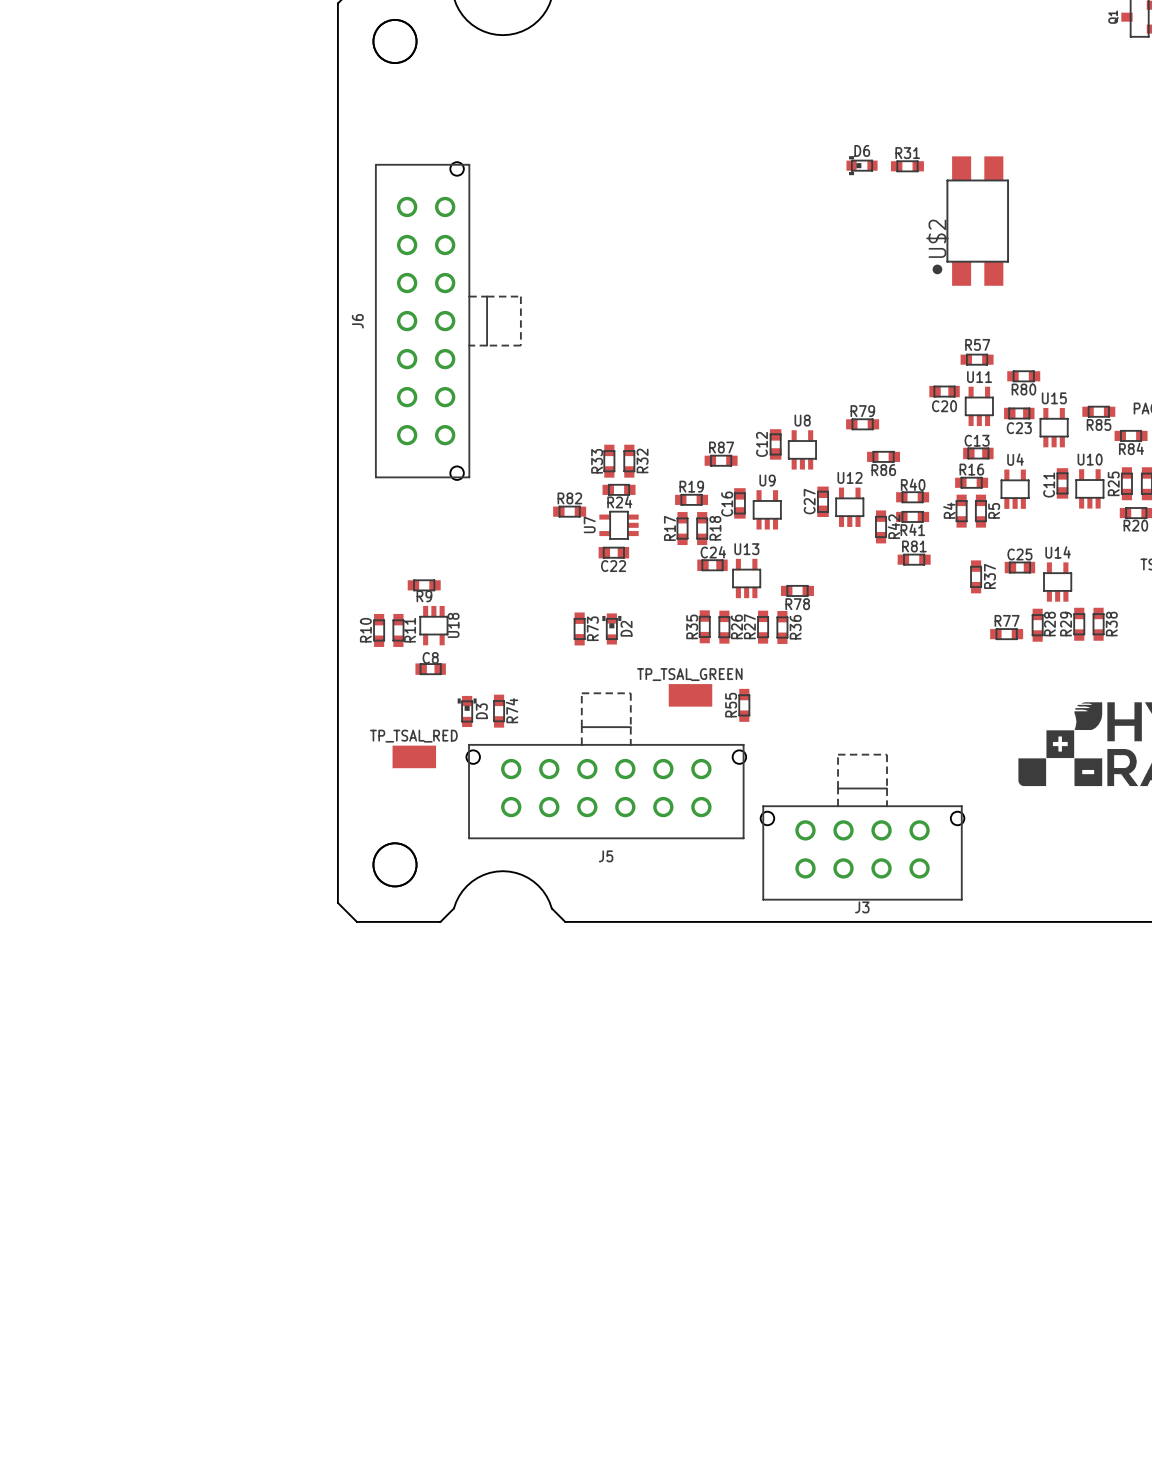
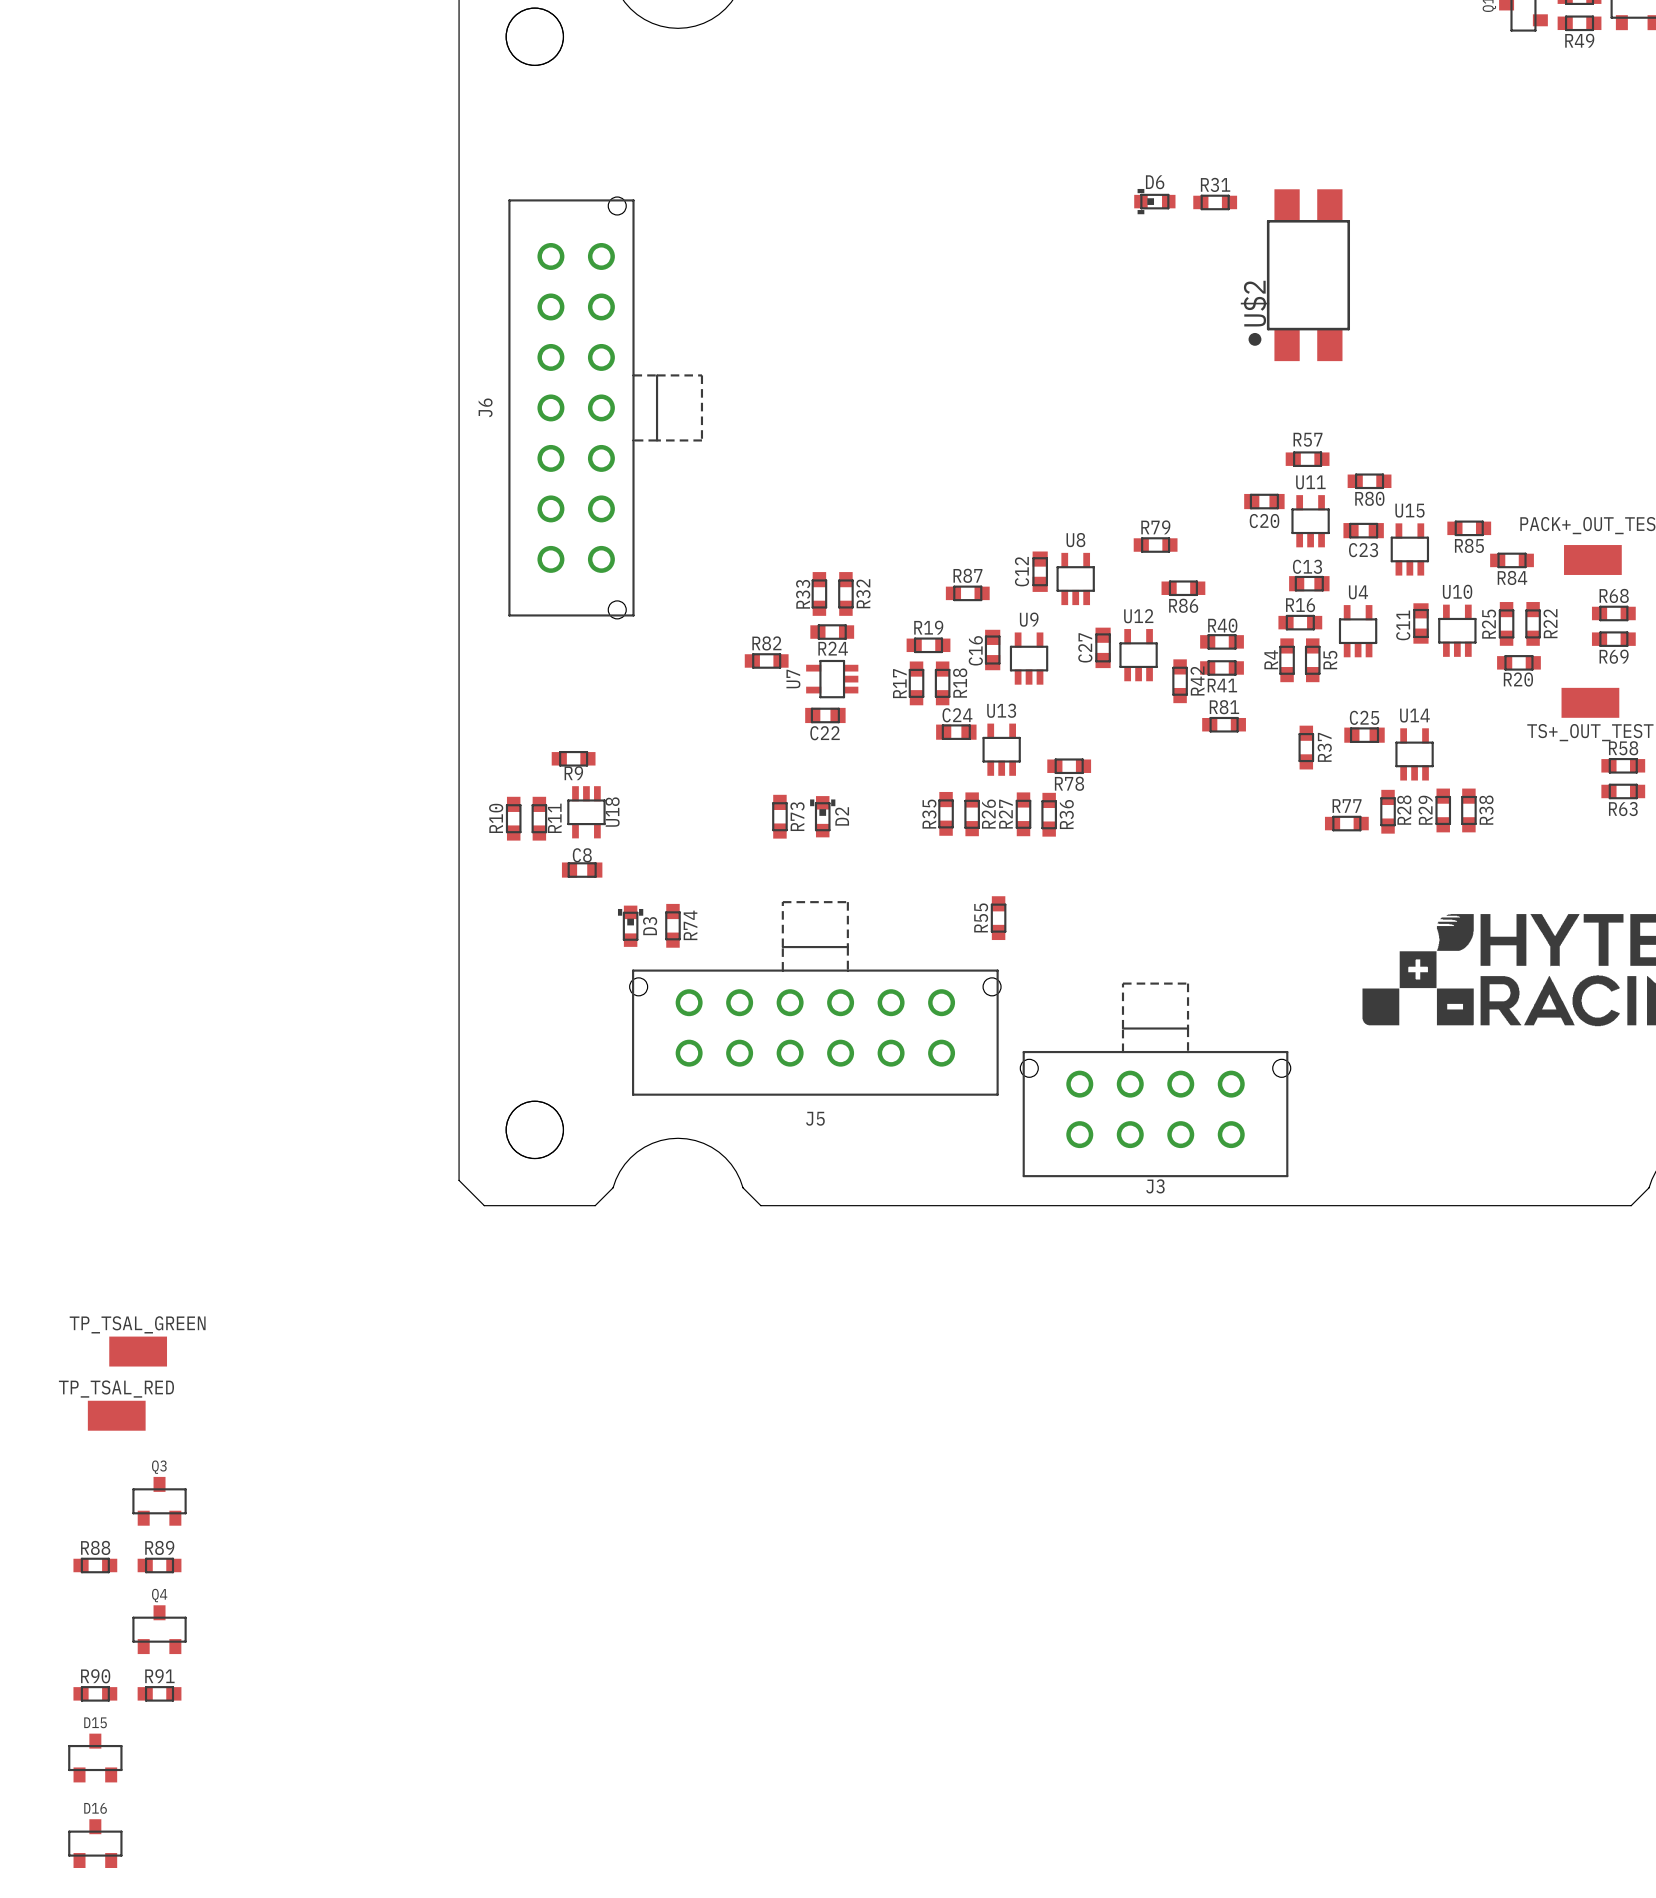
TP_TSAL_GREEN: (690, 695) -> none
TP_TSAL_RED: (414, 756) -> none
TP_TSAL_GREEN: none -> (138, 1351)
TP_TSAL_RED: none -> (116, 1415)
Q3: none -> (159, 1501)
R88: none -> (95, 1565)
R89: none -> (159, 1565)
Q4: none -> (159, 1629)
R90: none -> (95, 1693)
R91: none -> (159, 1693)
D15: none -> (95, 1758)
D16: none -> (95, 1843)

